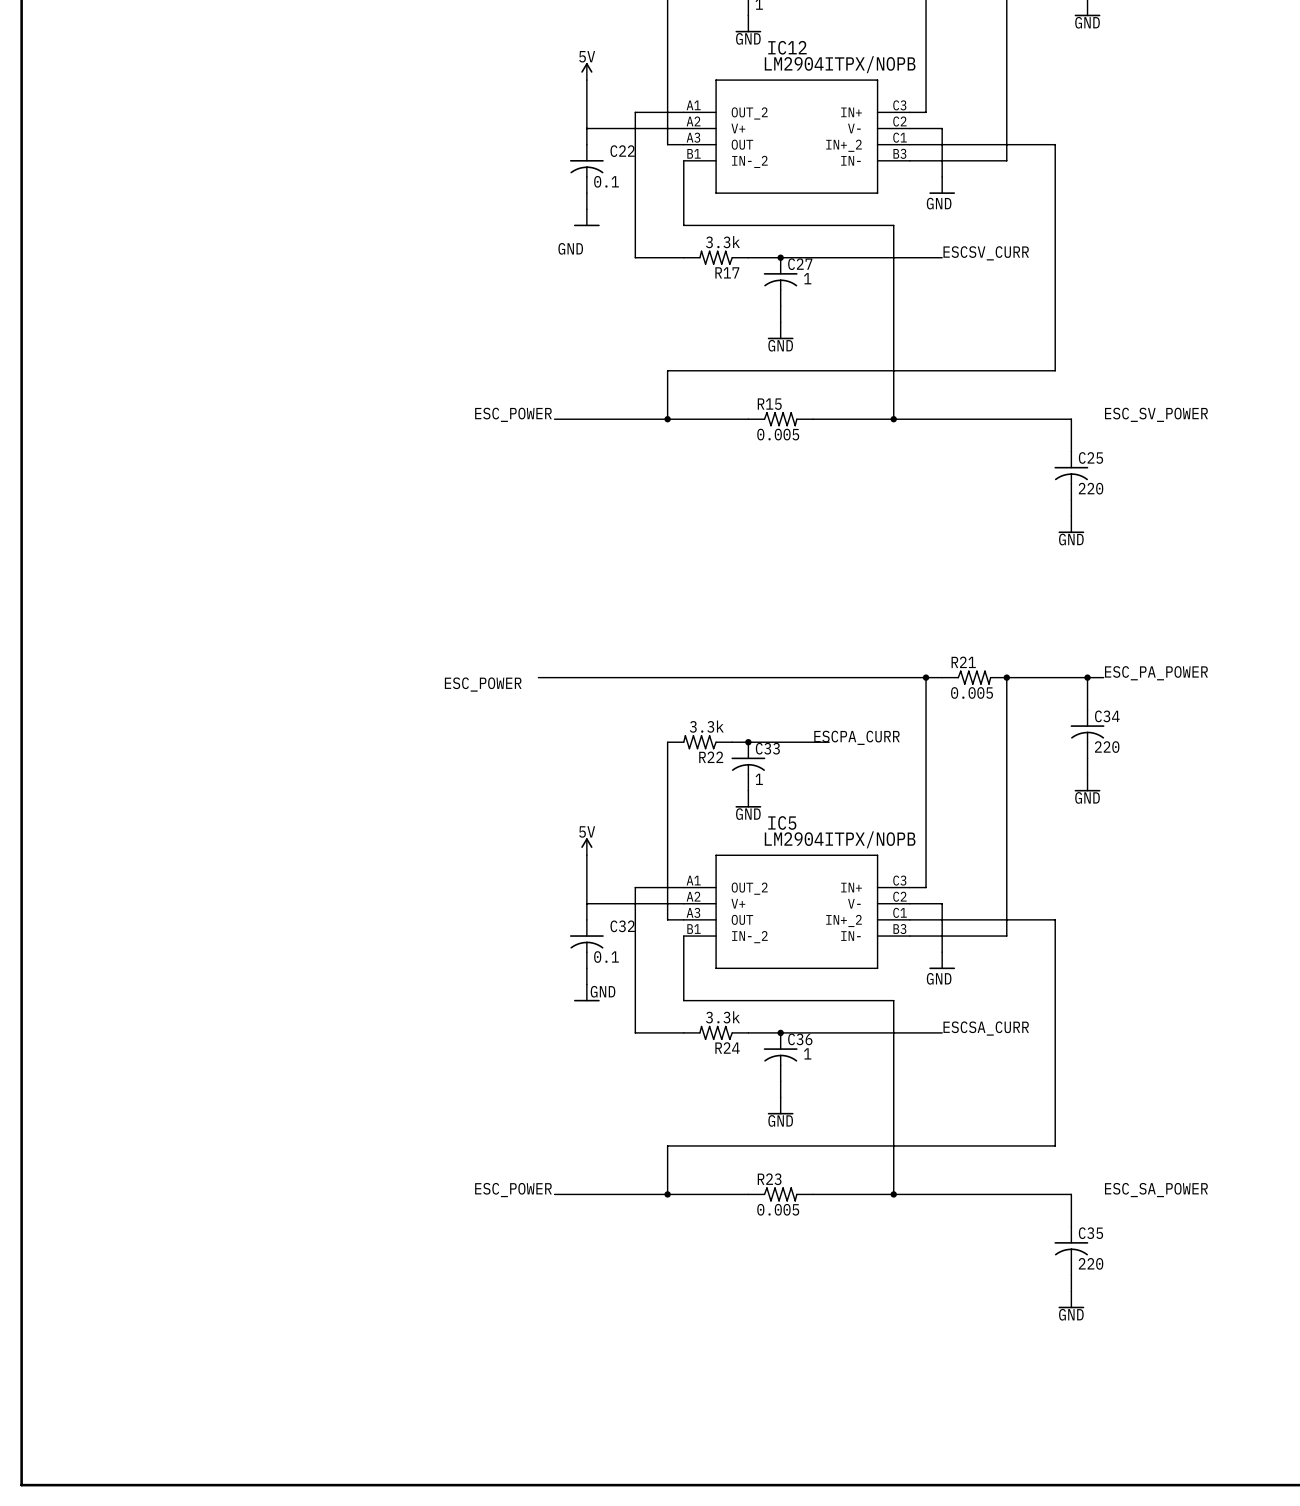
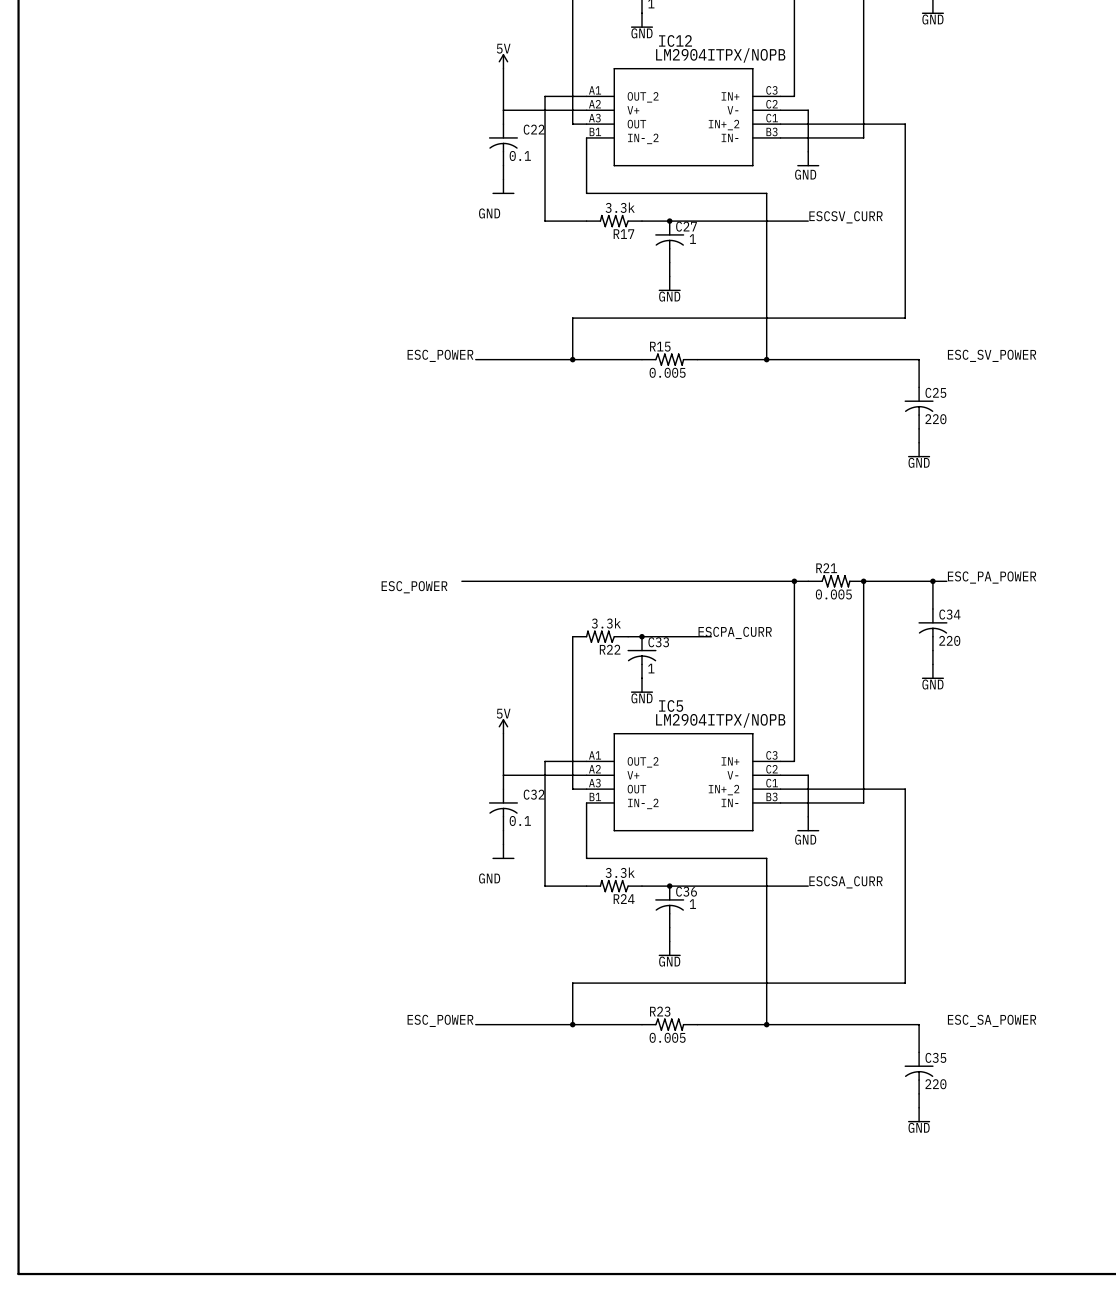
power symbol text position: GND (603, 991) -> GND (489, 878)

